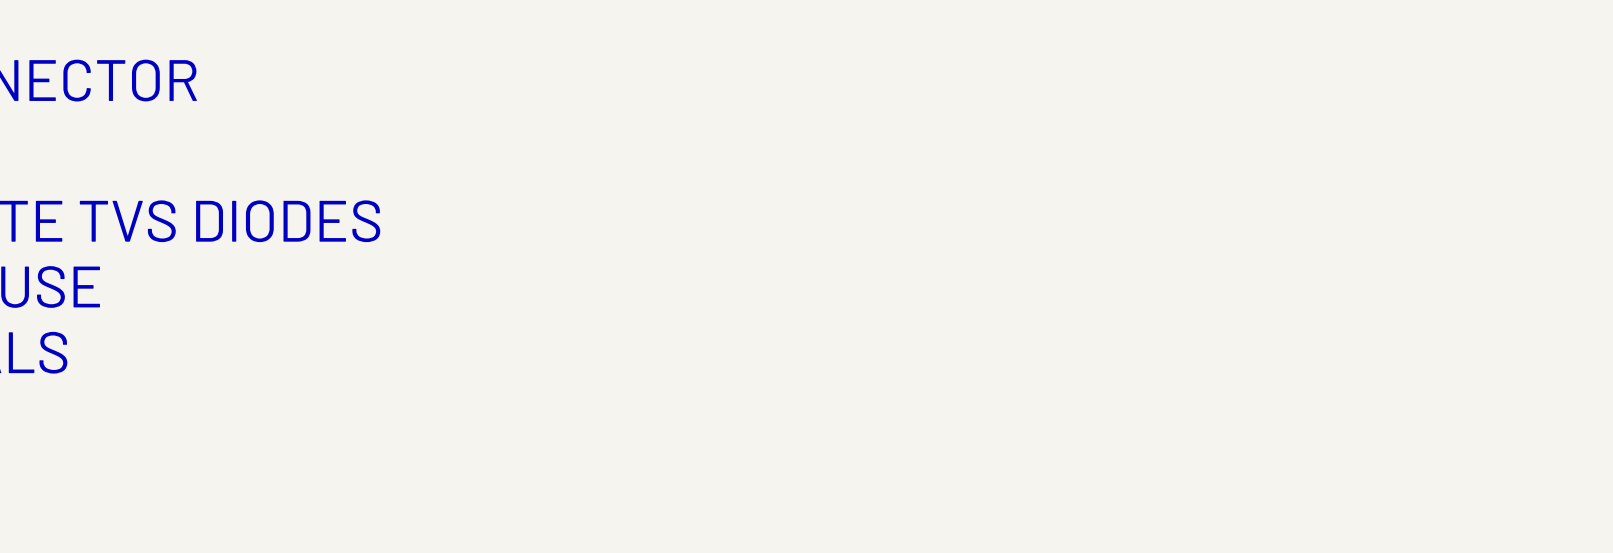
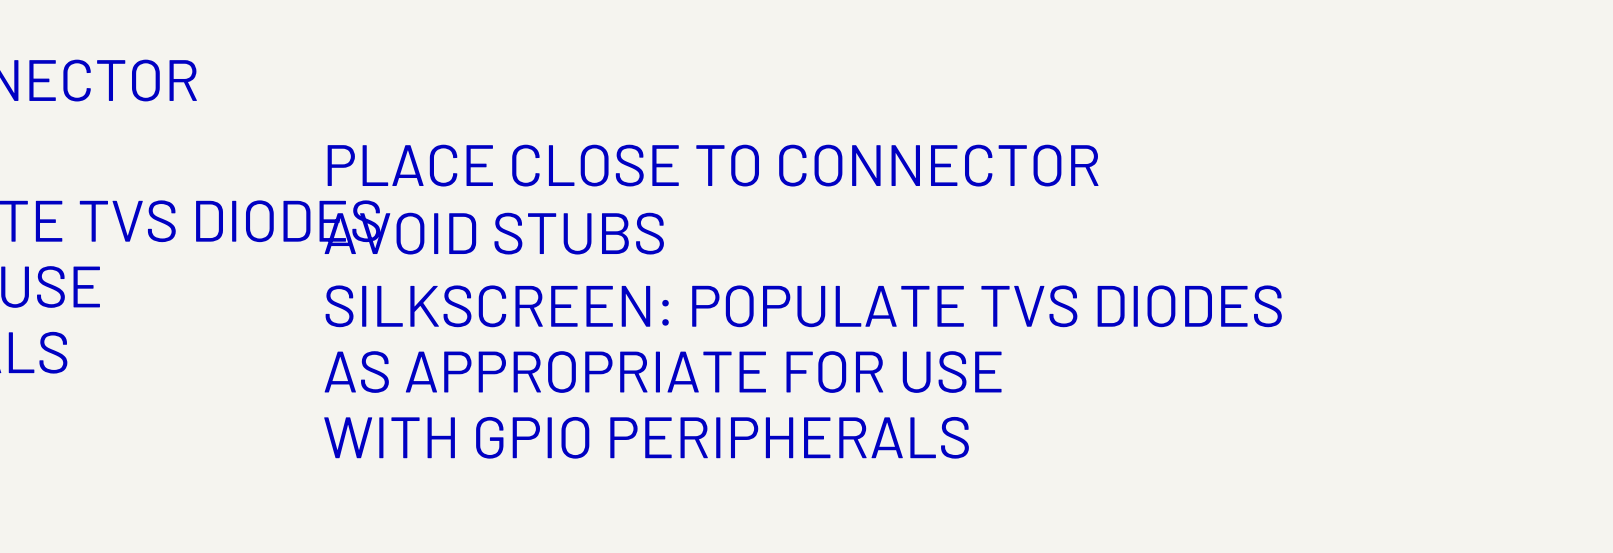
text: none -> PLACE CLOSE TO CONNECTOR (713, 165)
text: none -> AVOID STUBS (494, 233)
text: none -> SILKSCREEN: POPULATE TVS DIODES (803, 306)
text: none -> AS APPROPRIATE FOR USE (663, 372)
text: none -> WITH GPIO PERIPHERALS (646, 437)

